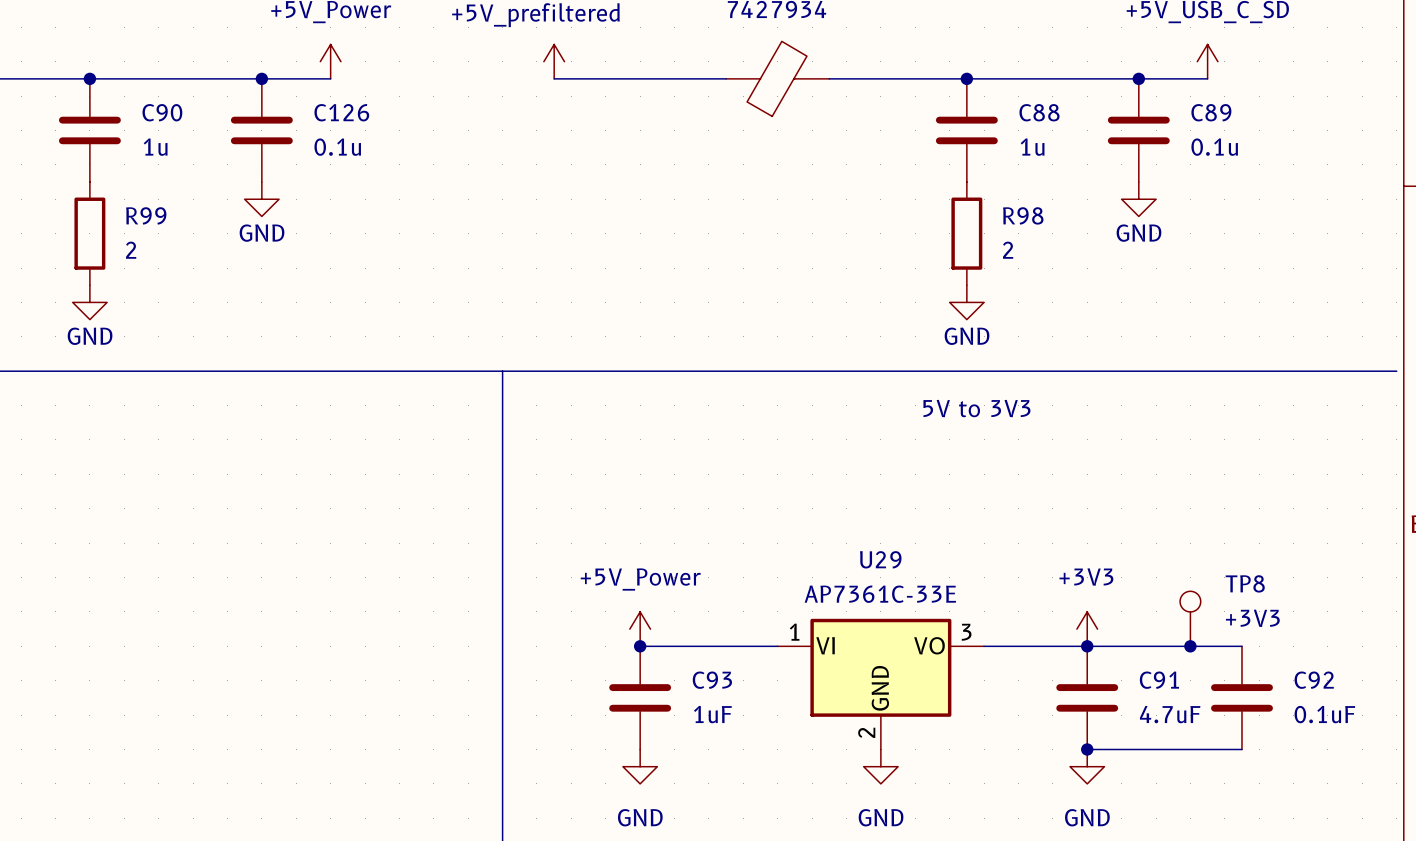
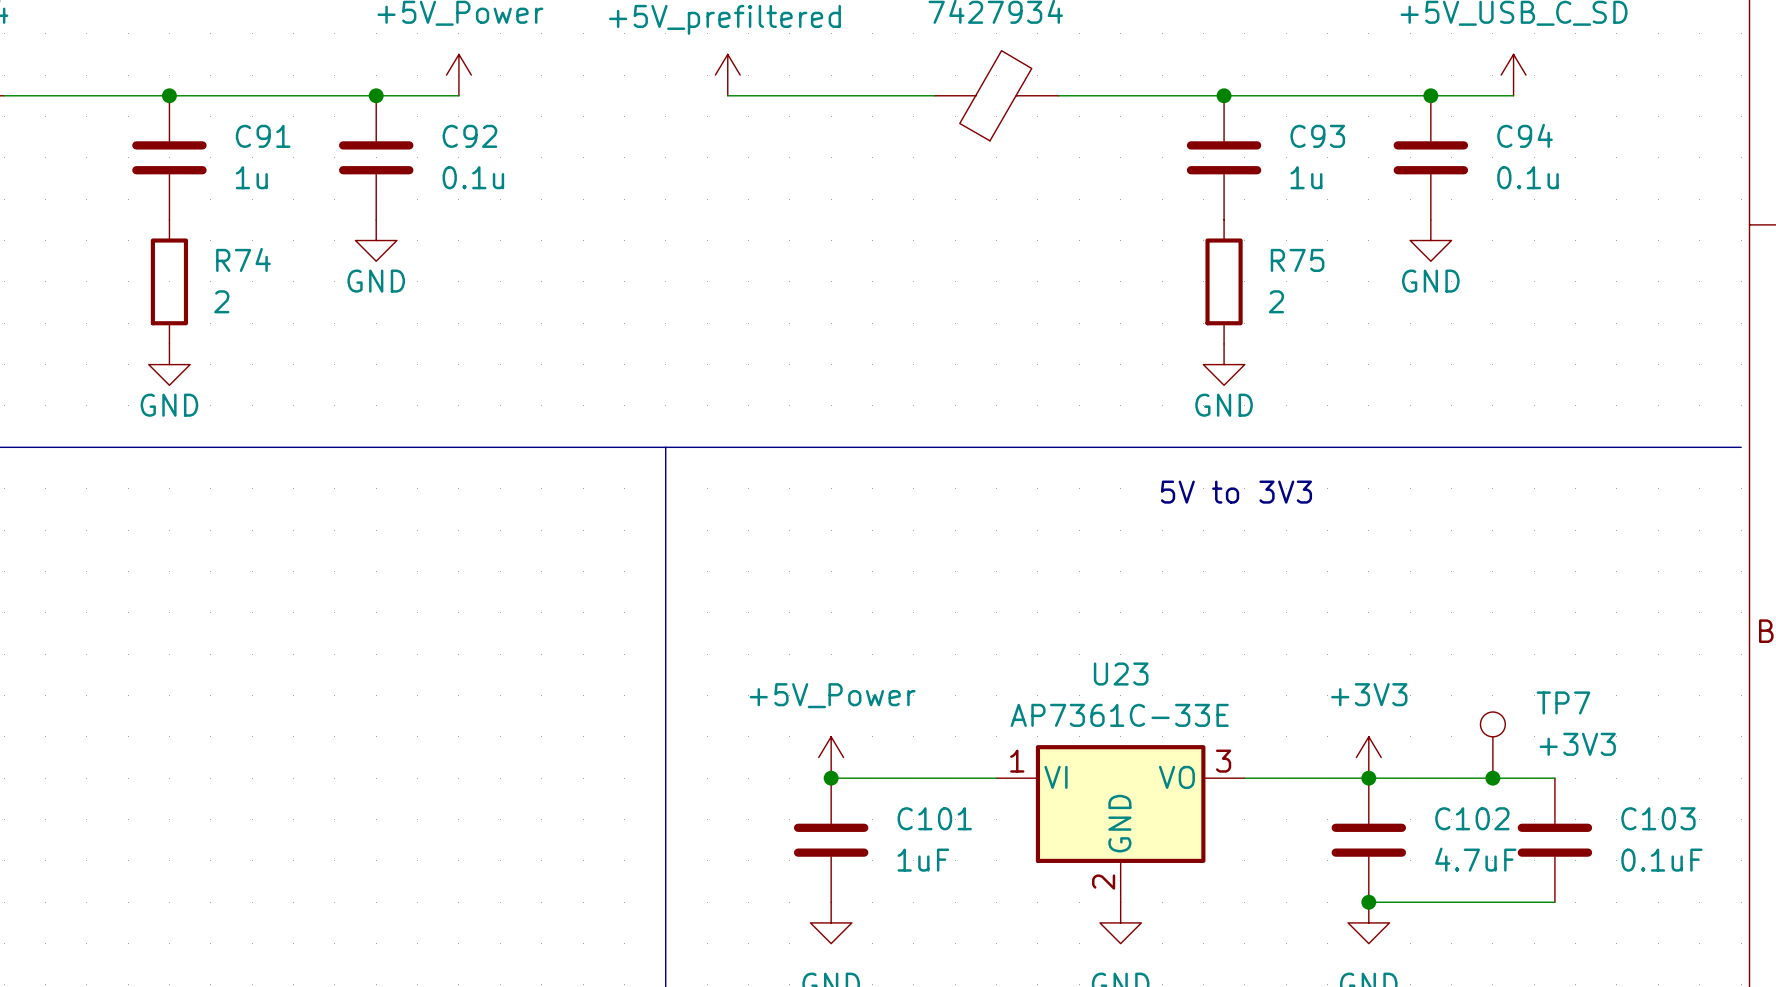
C90 name: C90 (162, 112) -> C91 (263, 136)
C126 name: C126 (341, 112) -> C92 (469, 136)
C88 name: C88 (1039, 112) -> C93 (1317, 136)
C89 name: C89 (1211, 112) -> C94 (1525, 135)
R99 name: R99 (146, 215) -> R74 (243, 259)
R98 name: R98 (1023, 215) -> R75 (1297, 260)
U29 name: U29 (880, 559) -> U23 (1121, 674)
TP8 name: TP8 (1245, 583) -> TP7 (1563, 702)
C93 name: C93 (712, 680) -> C101 (934, 818)
C91 name: C91 (1159, 680) -> C102 (1472, 818)
C92 name: C92 (1314, 680) -> C103 (1658, 818)

